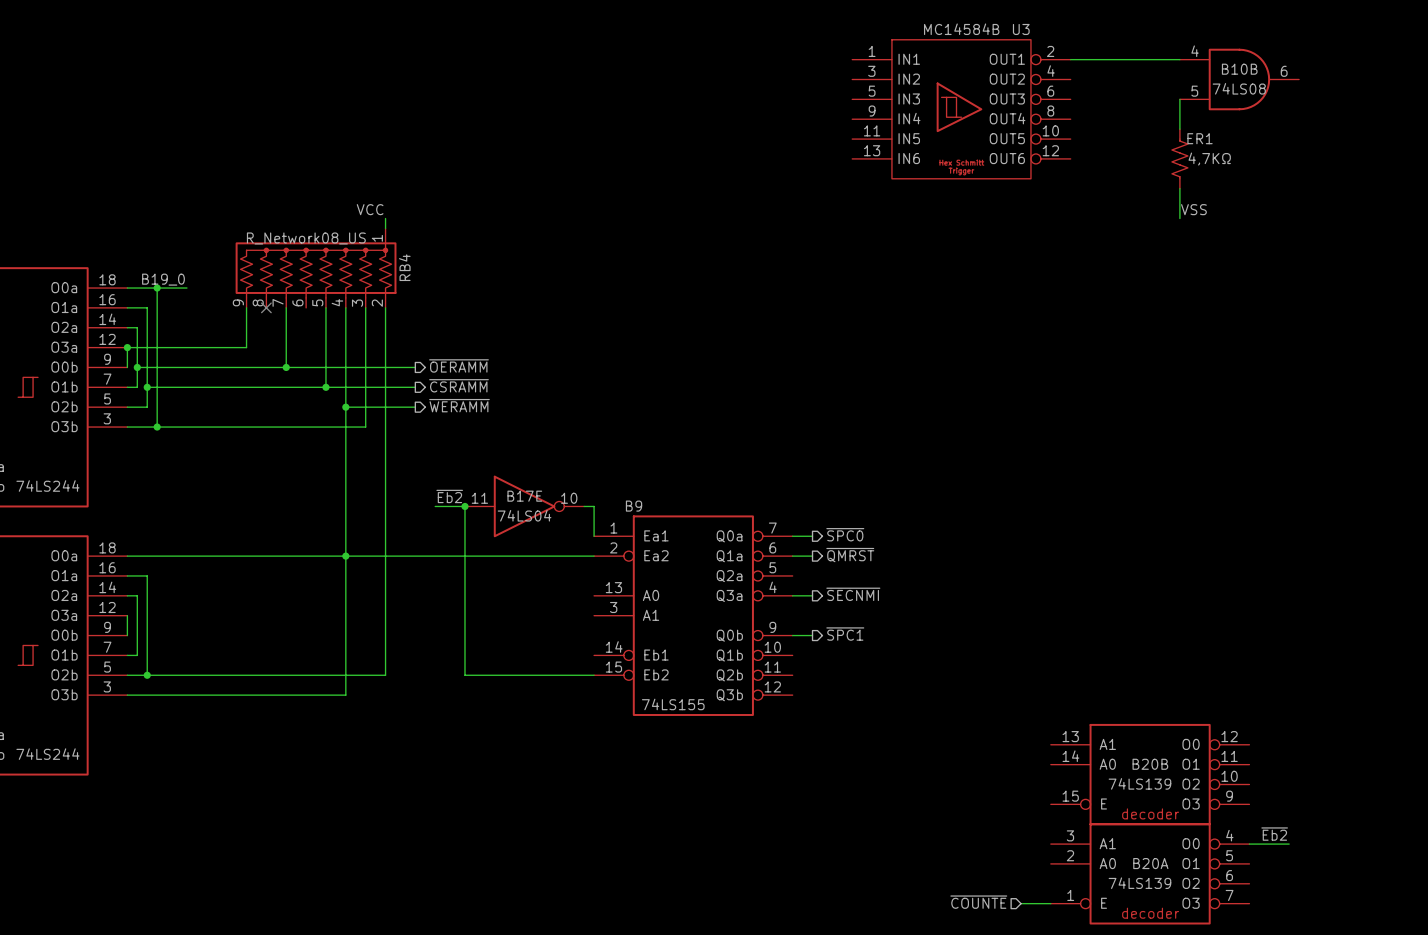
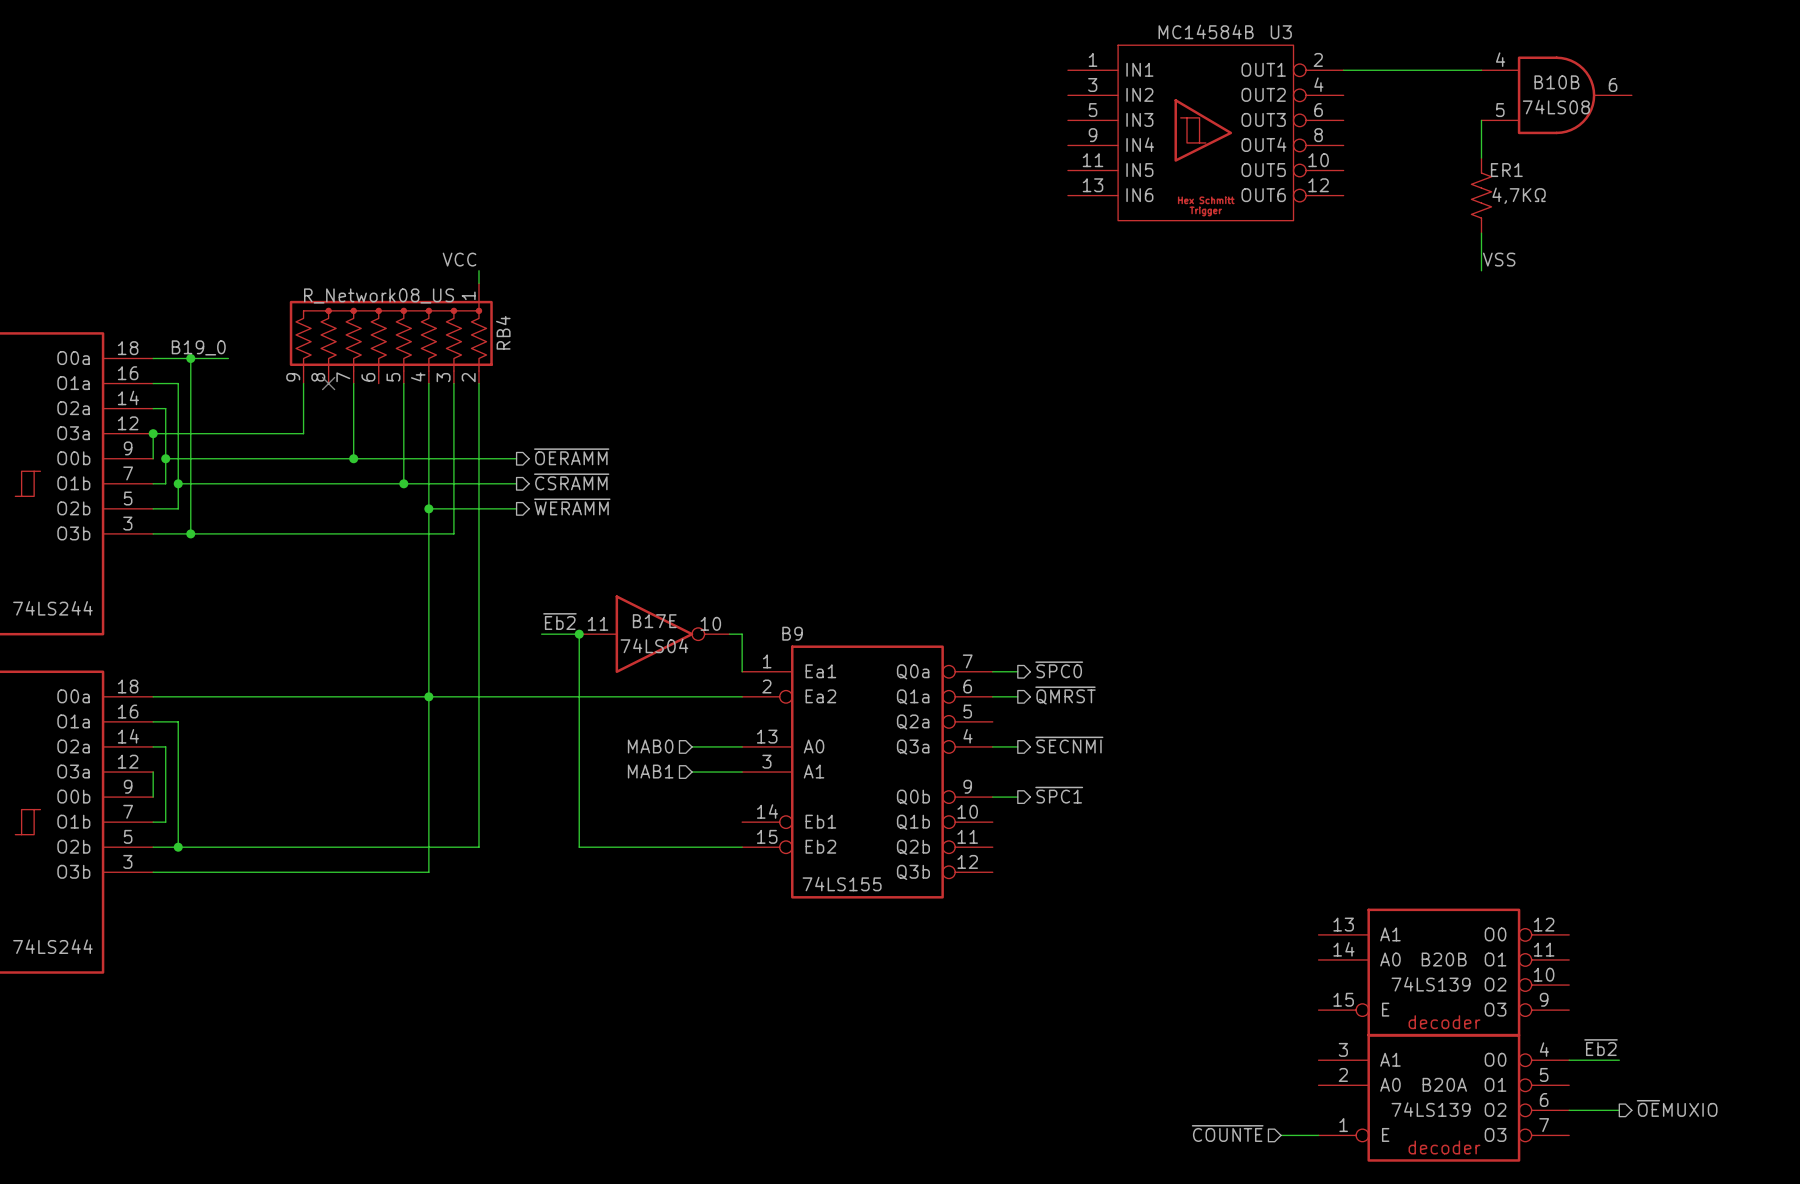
hierarchical label: none -> MAB0 (650, 746)
wire: none -> (692, 746) (742, 746)
hierarchical label: none -> MAB1 (650, 771)
wire: none -> (692, 772) (742, 772)
hierarchical label: none -> ~{OE}MUXIO (1677, 1108)
wire: none -> (1569, 1110) (1619, 1110)

